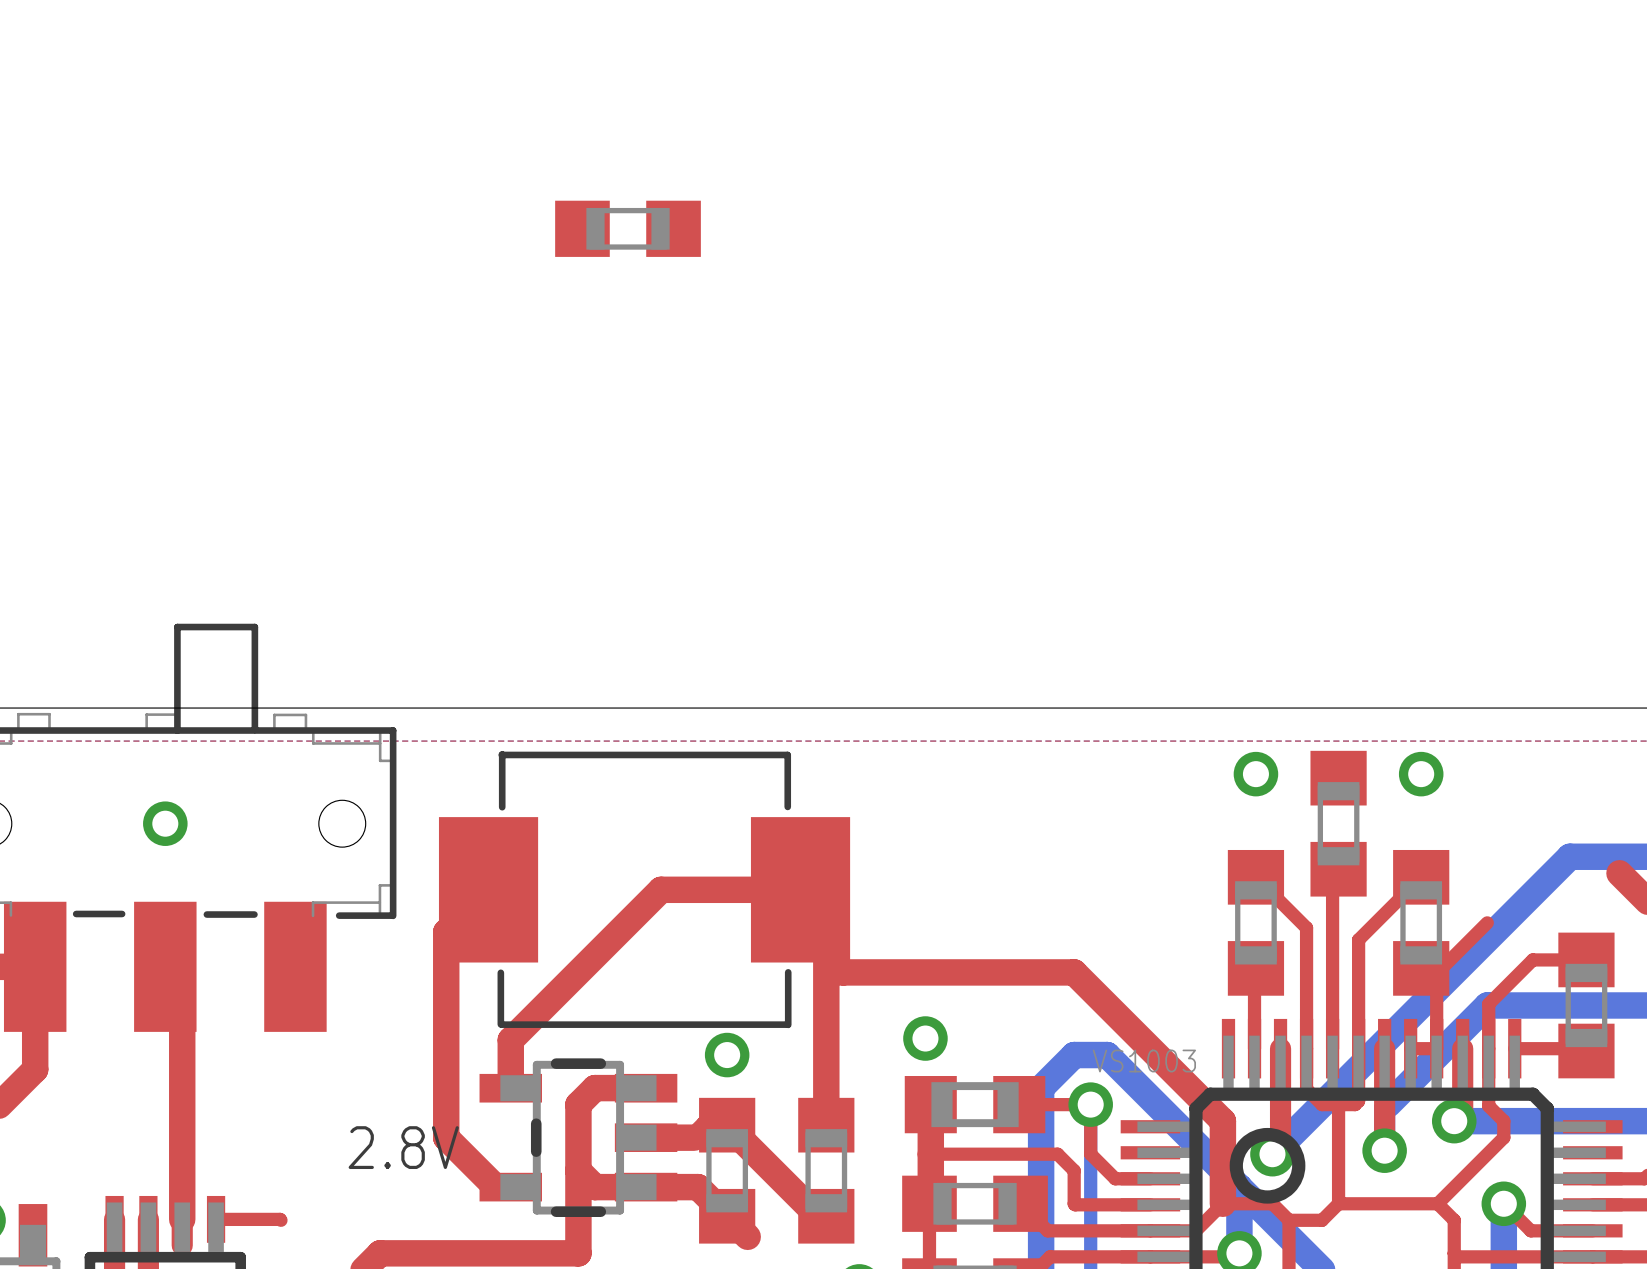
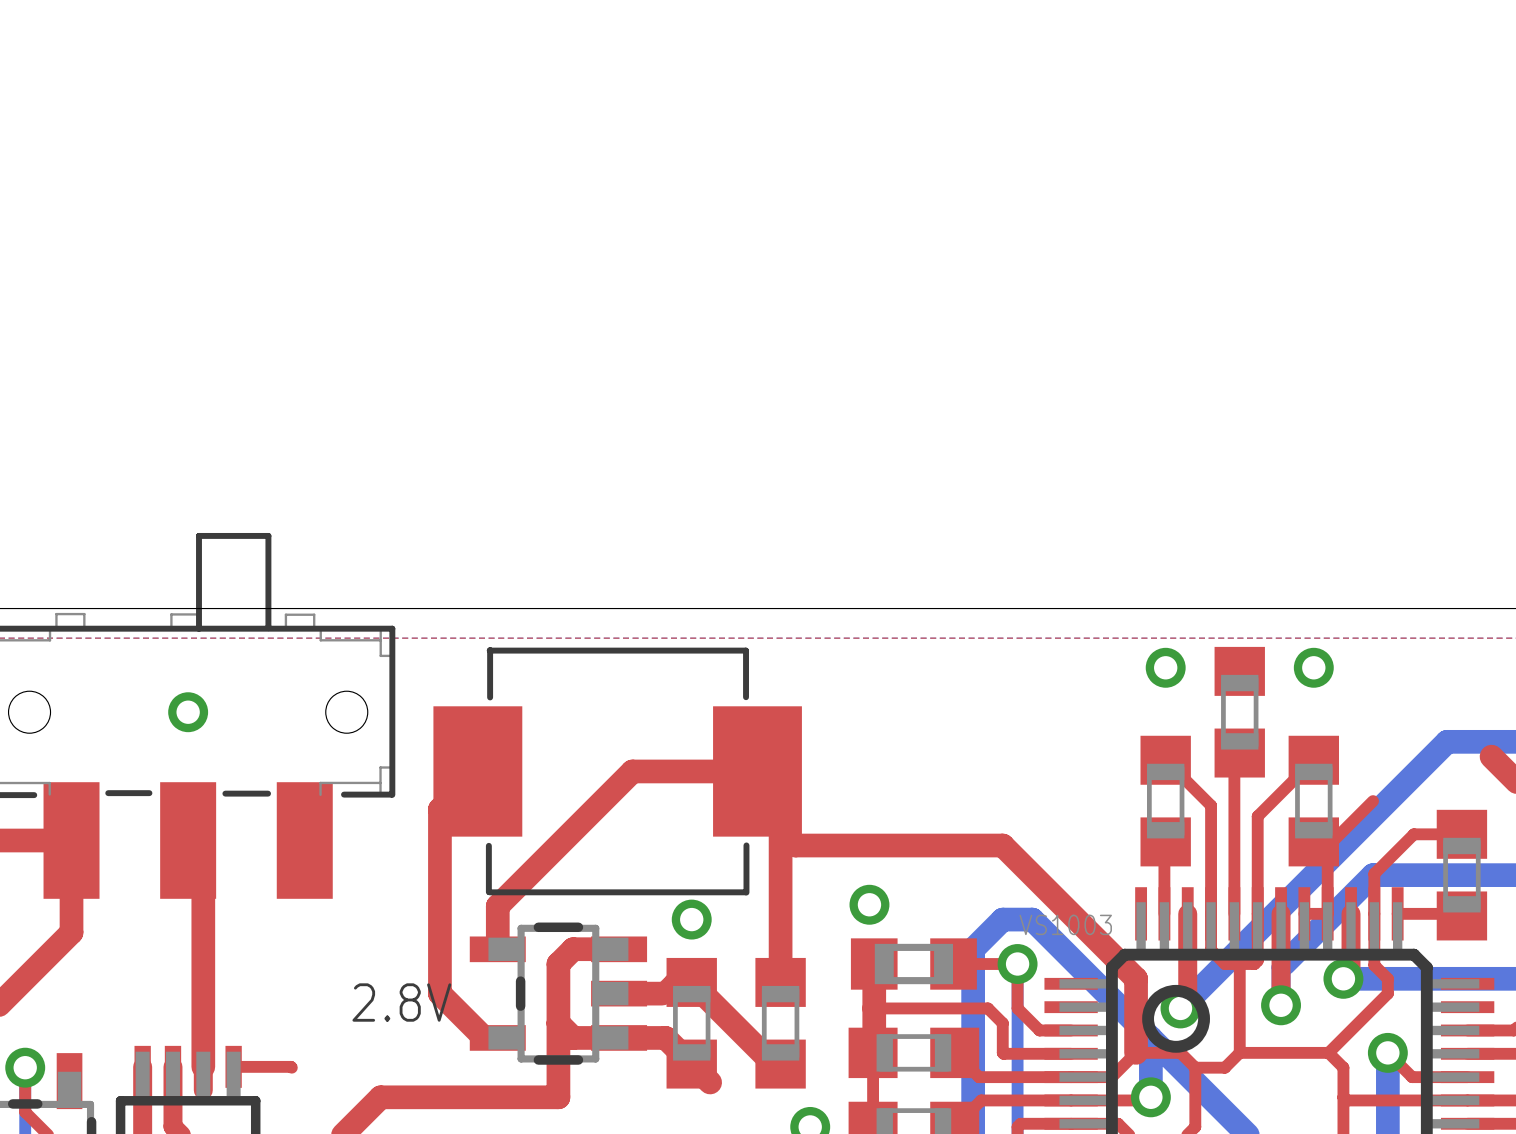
part: (628, 228) -> none

